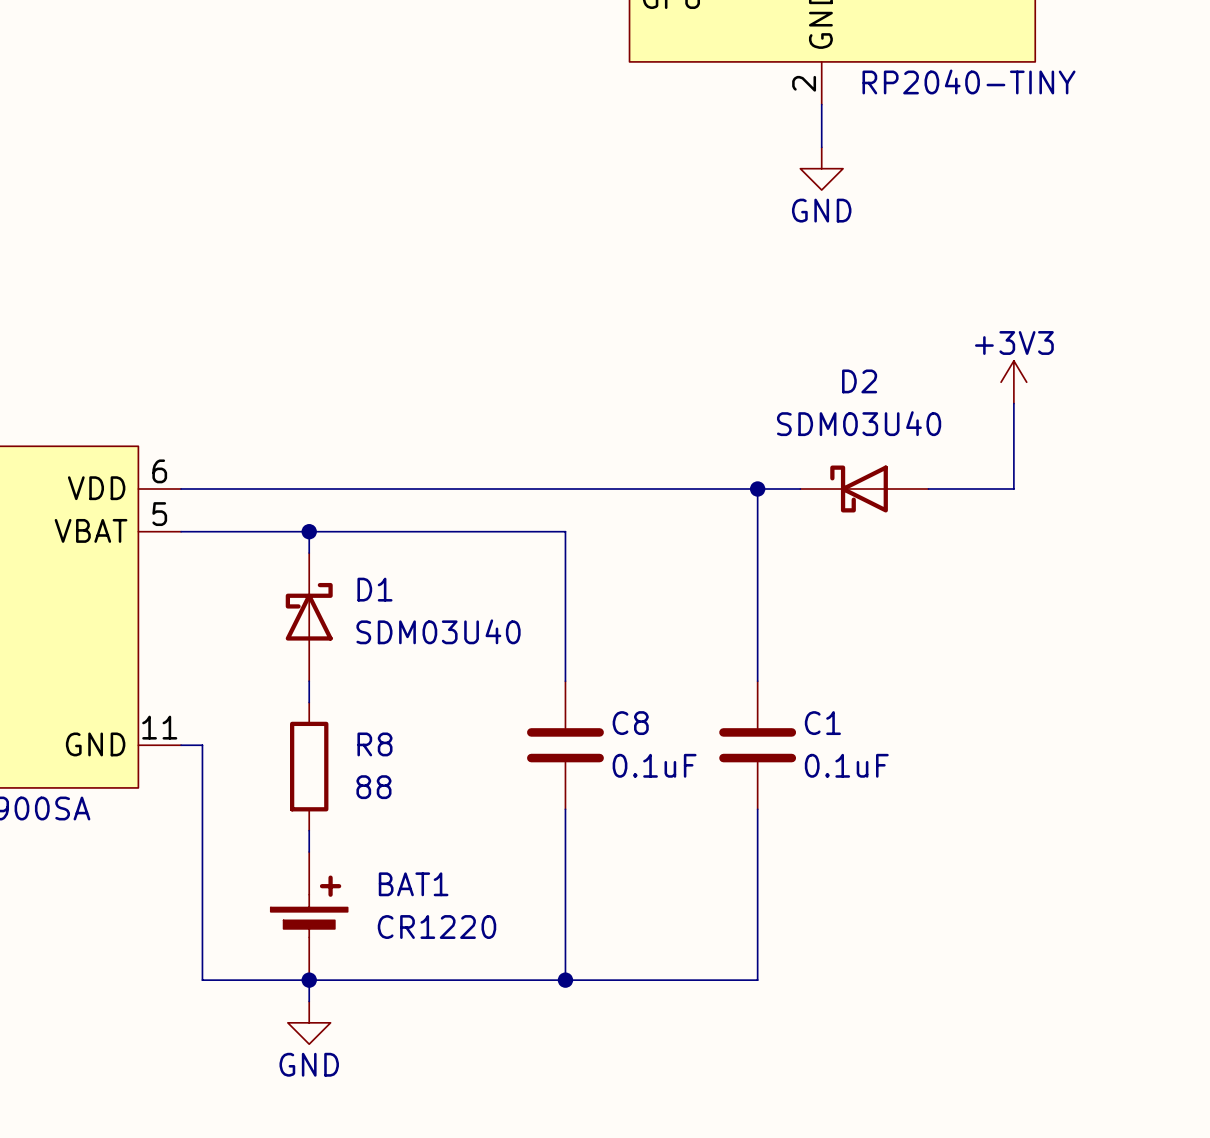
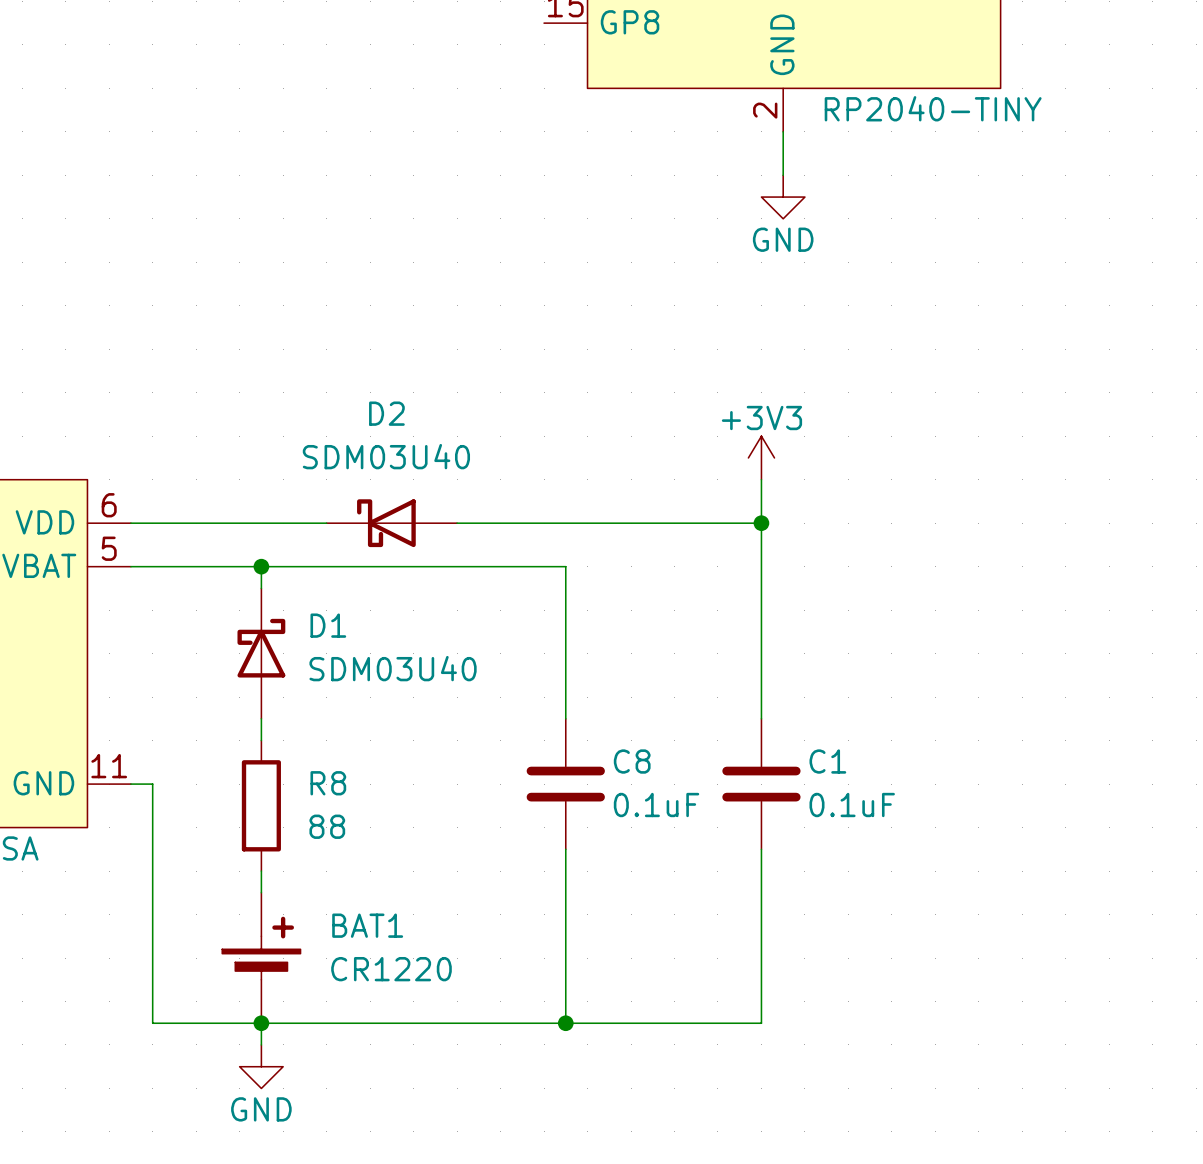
power symbol position: +3V3 (1013, 382) -> +3V3 (761, 457)
wire: (1013, 403) (1013, 488) (928, 488) -> none
wire: none -> (761, 479) (761, 718)
wire: (757, 488) (757, 681) -> none
junction position: (757, 488) -> (761, 523)
D2 position: (864, 488) -> (391, 523)
wire: (565, 531) (565, 681) -> (522, 566) (565, 566) (565, 718)
C8 position: (565, 745) -> (565, 784)
C1 position: (757, 745) -> (761, 784)
wire: (565, 809) (565, 980) -> (565, 849) (565, 1023)
wire: (757, 809) (757, 980) -> (761, 849) (761, 1023) (717, 1023)
junction position: (565, 980) -> (565, 1023)

